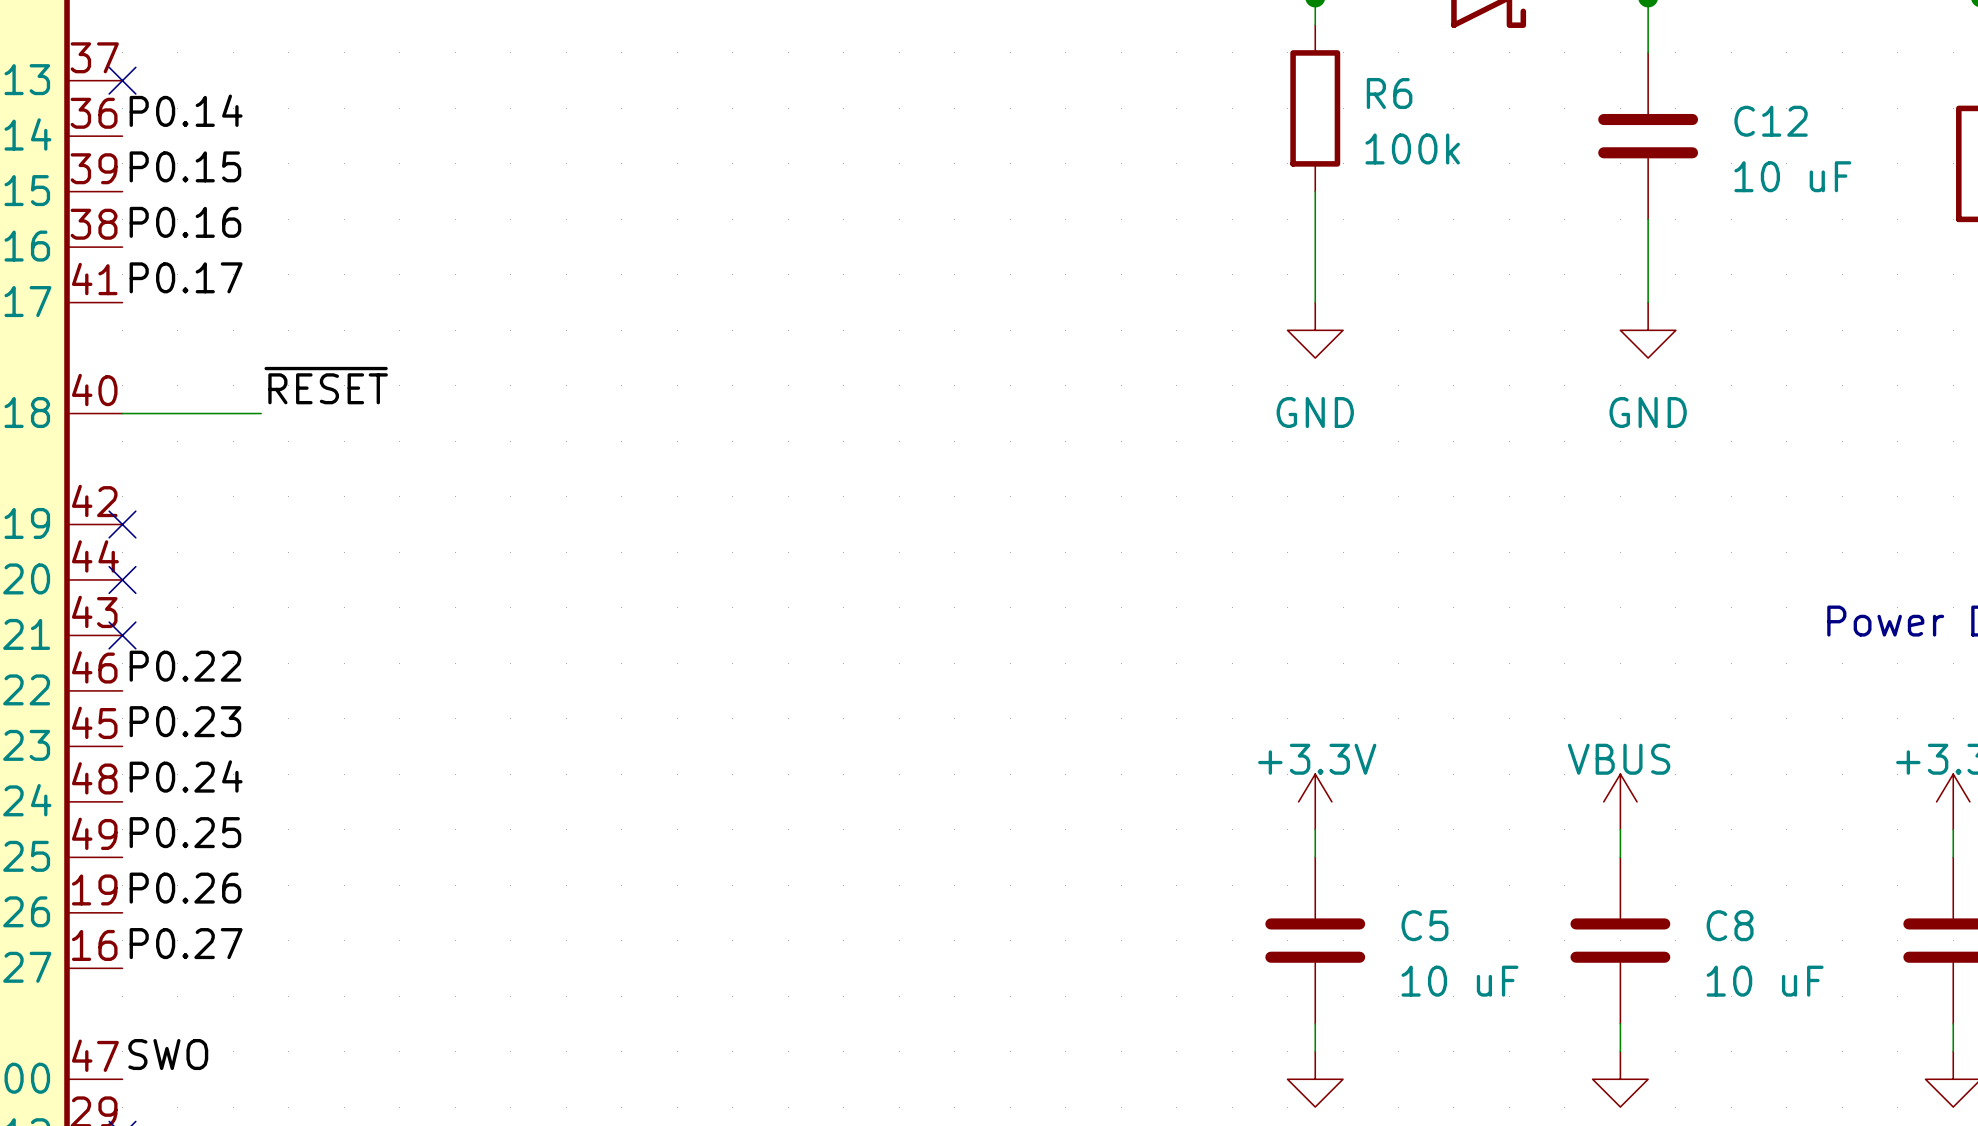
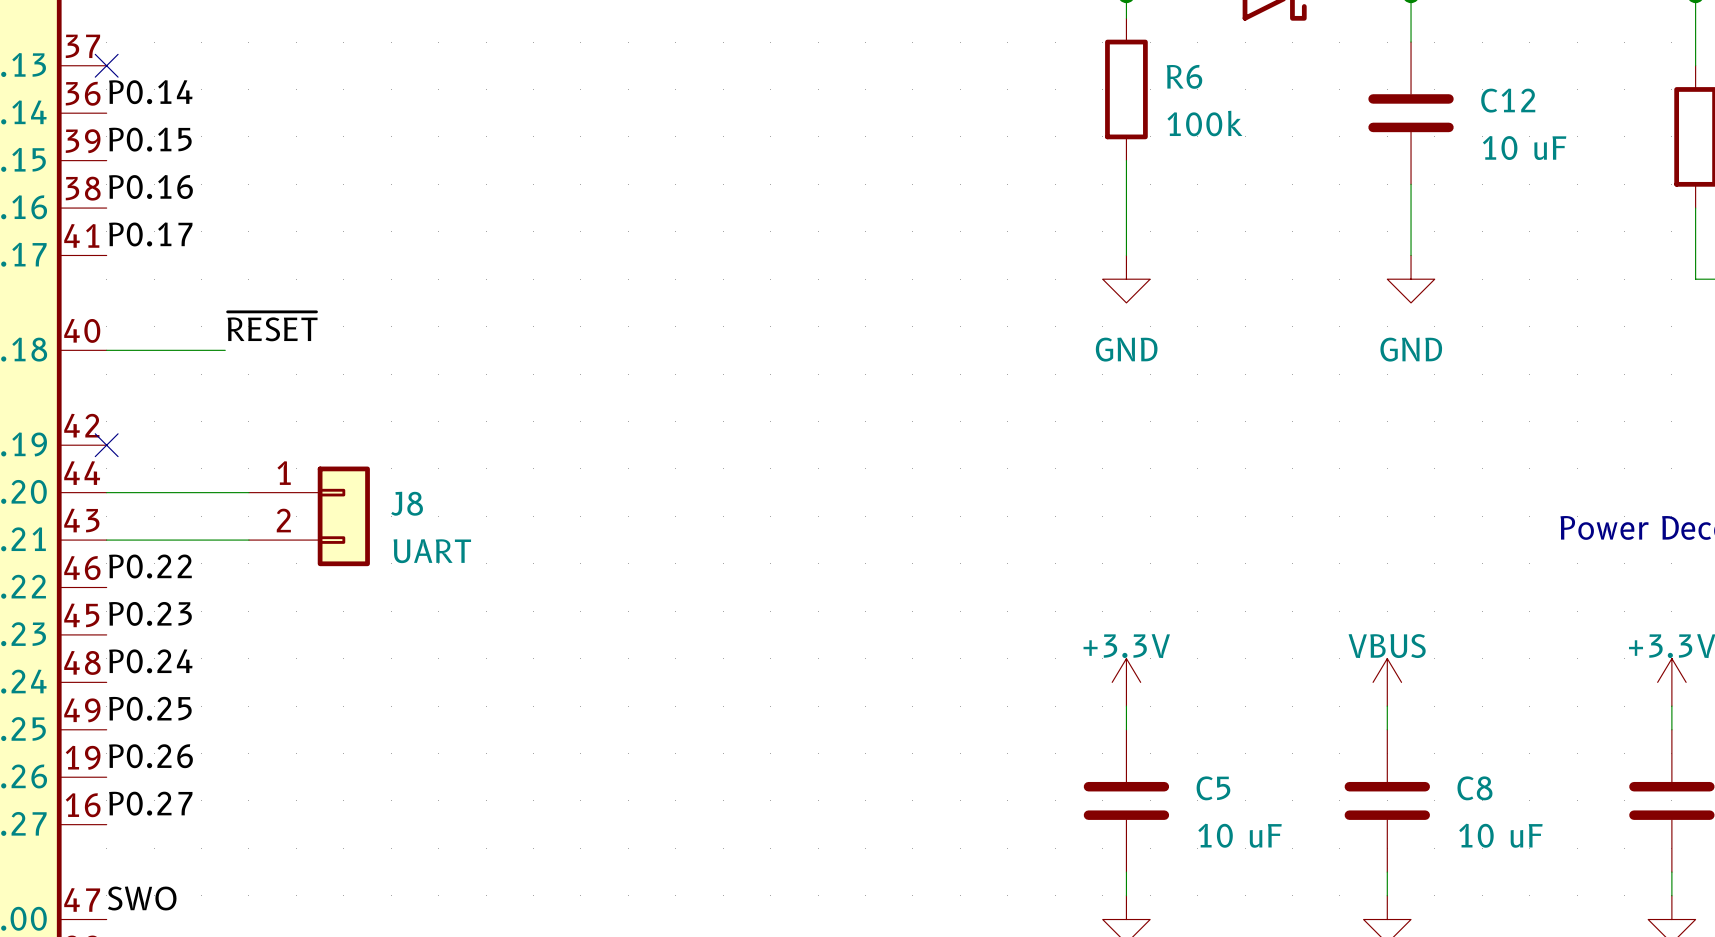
wire: none -> (106, 492) (248, 492)
no-connect mark: (122, 579) -> none
J8: none -> UART (309, 516)
wire: none -> (106, 540) (248, 540)
no-connect mark: (122, 635) -> none

